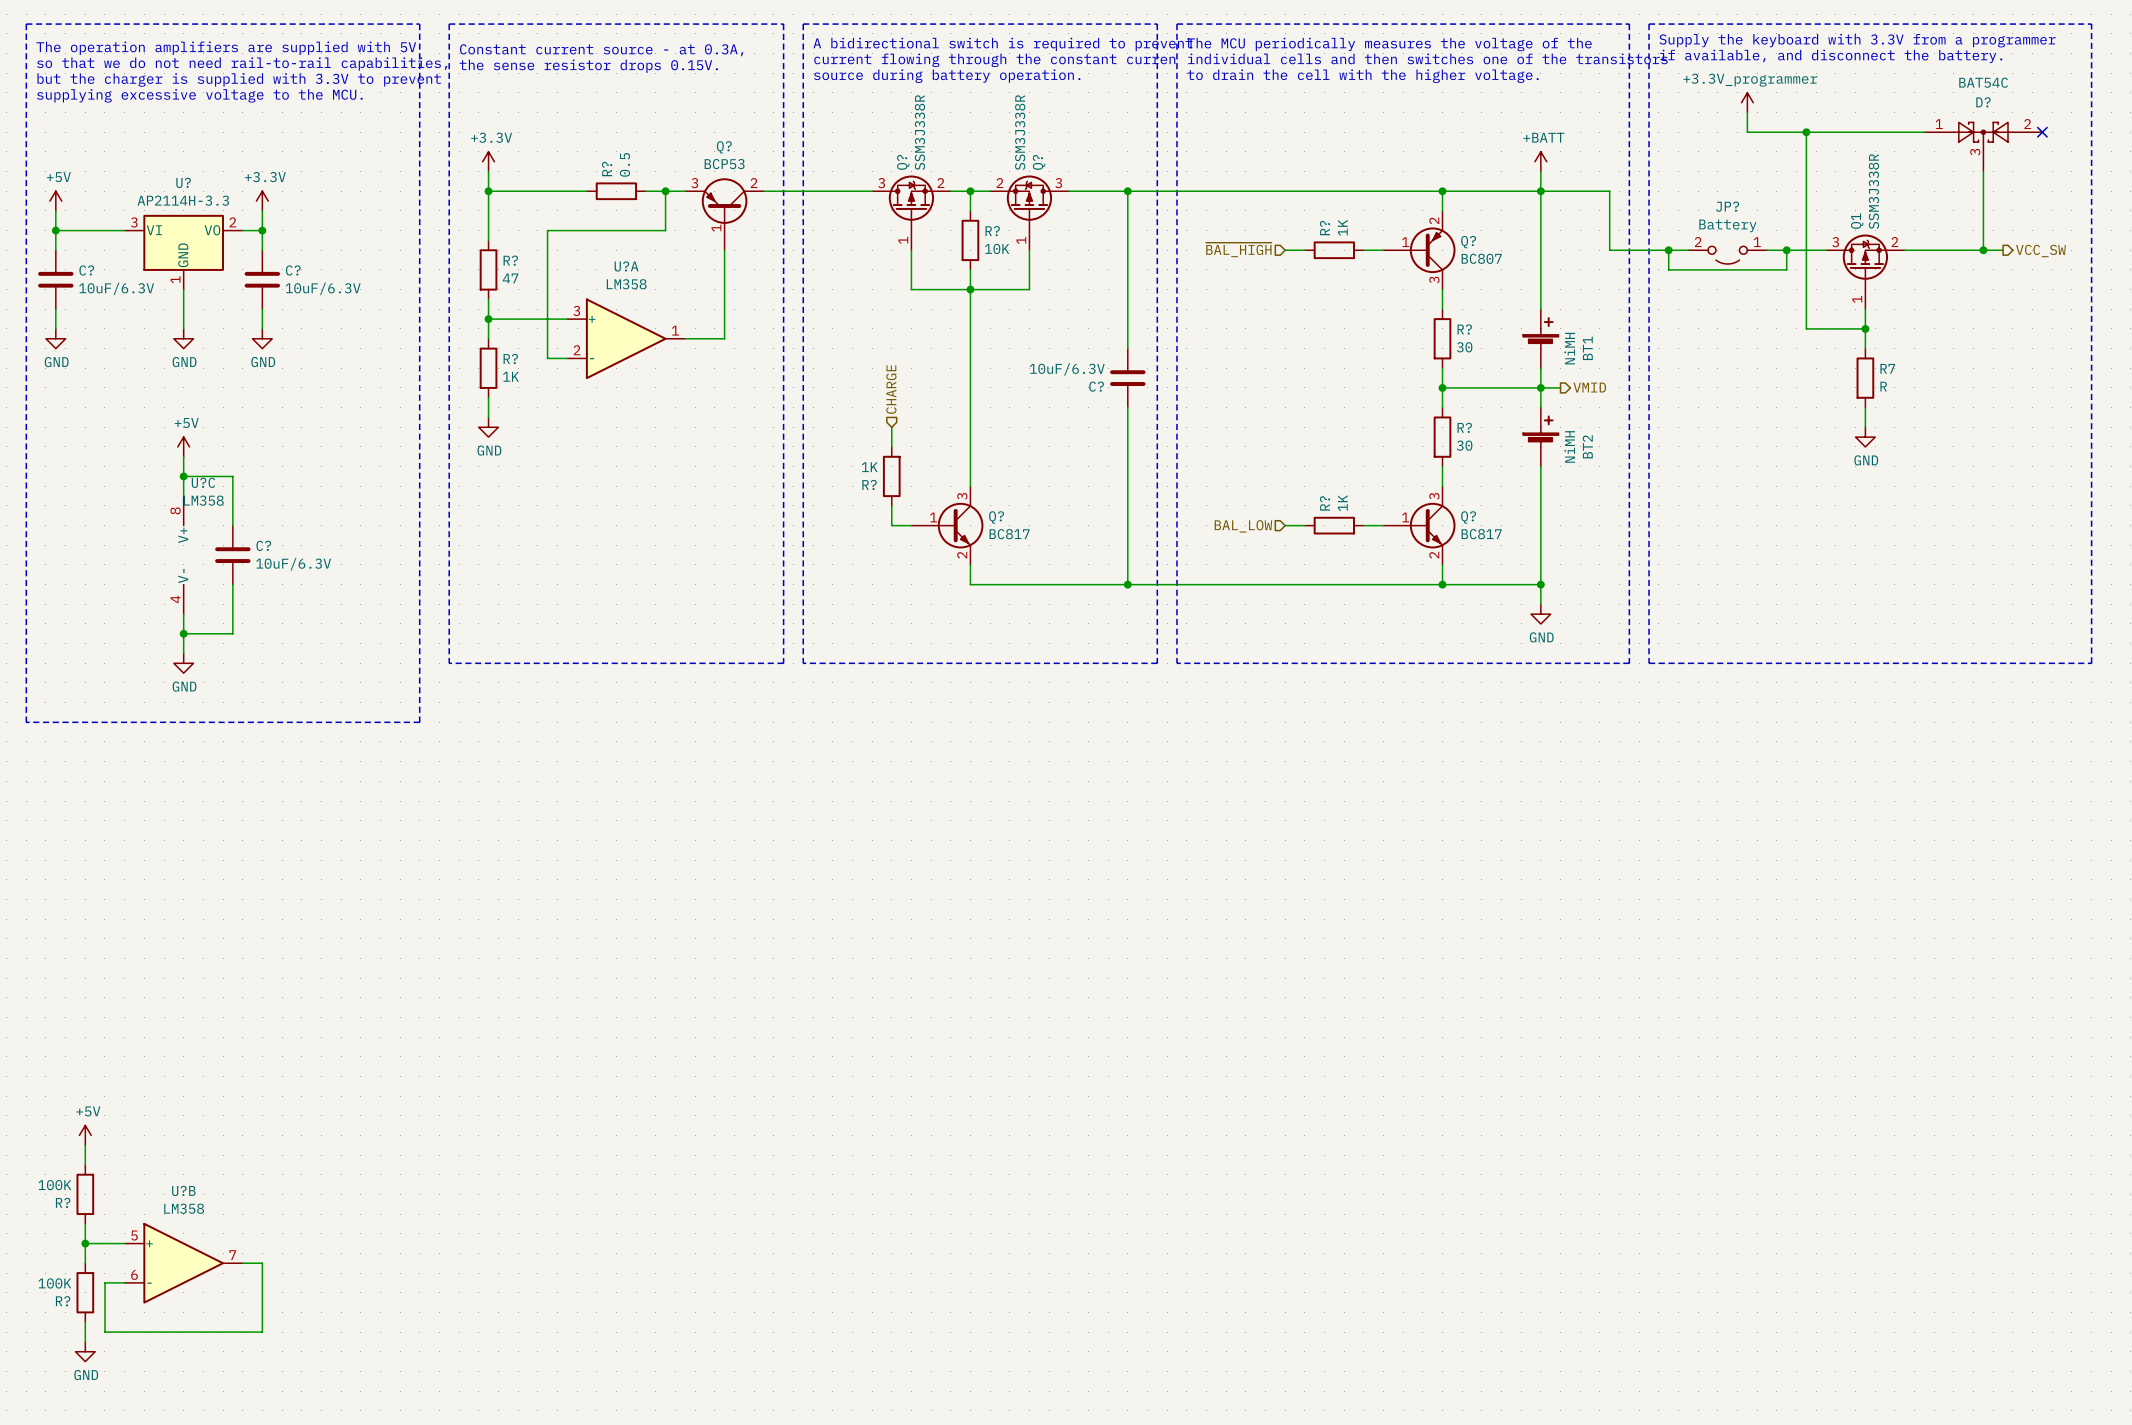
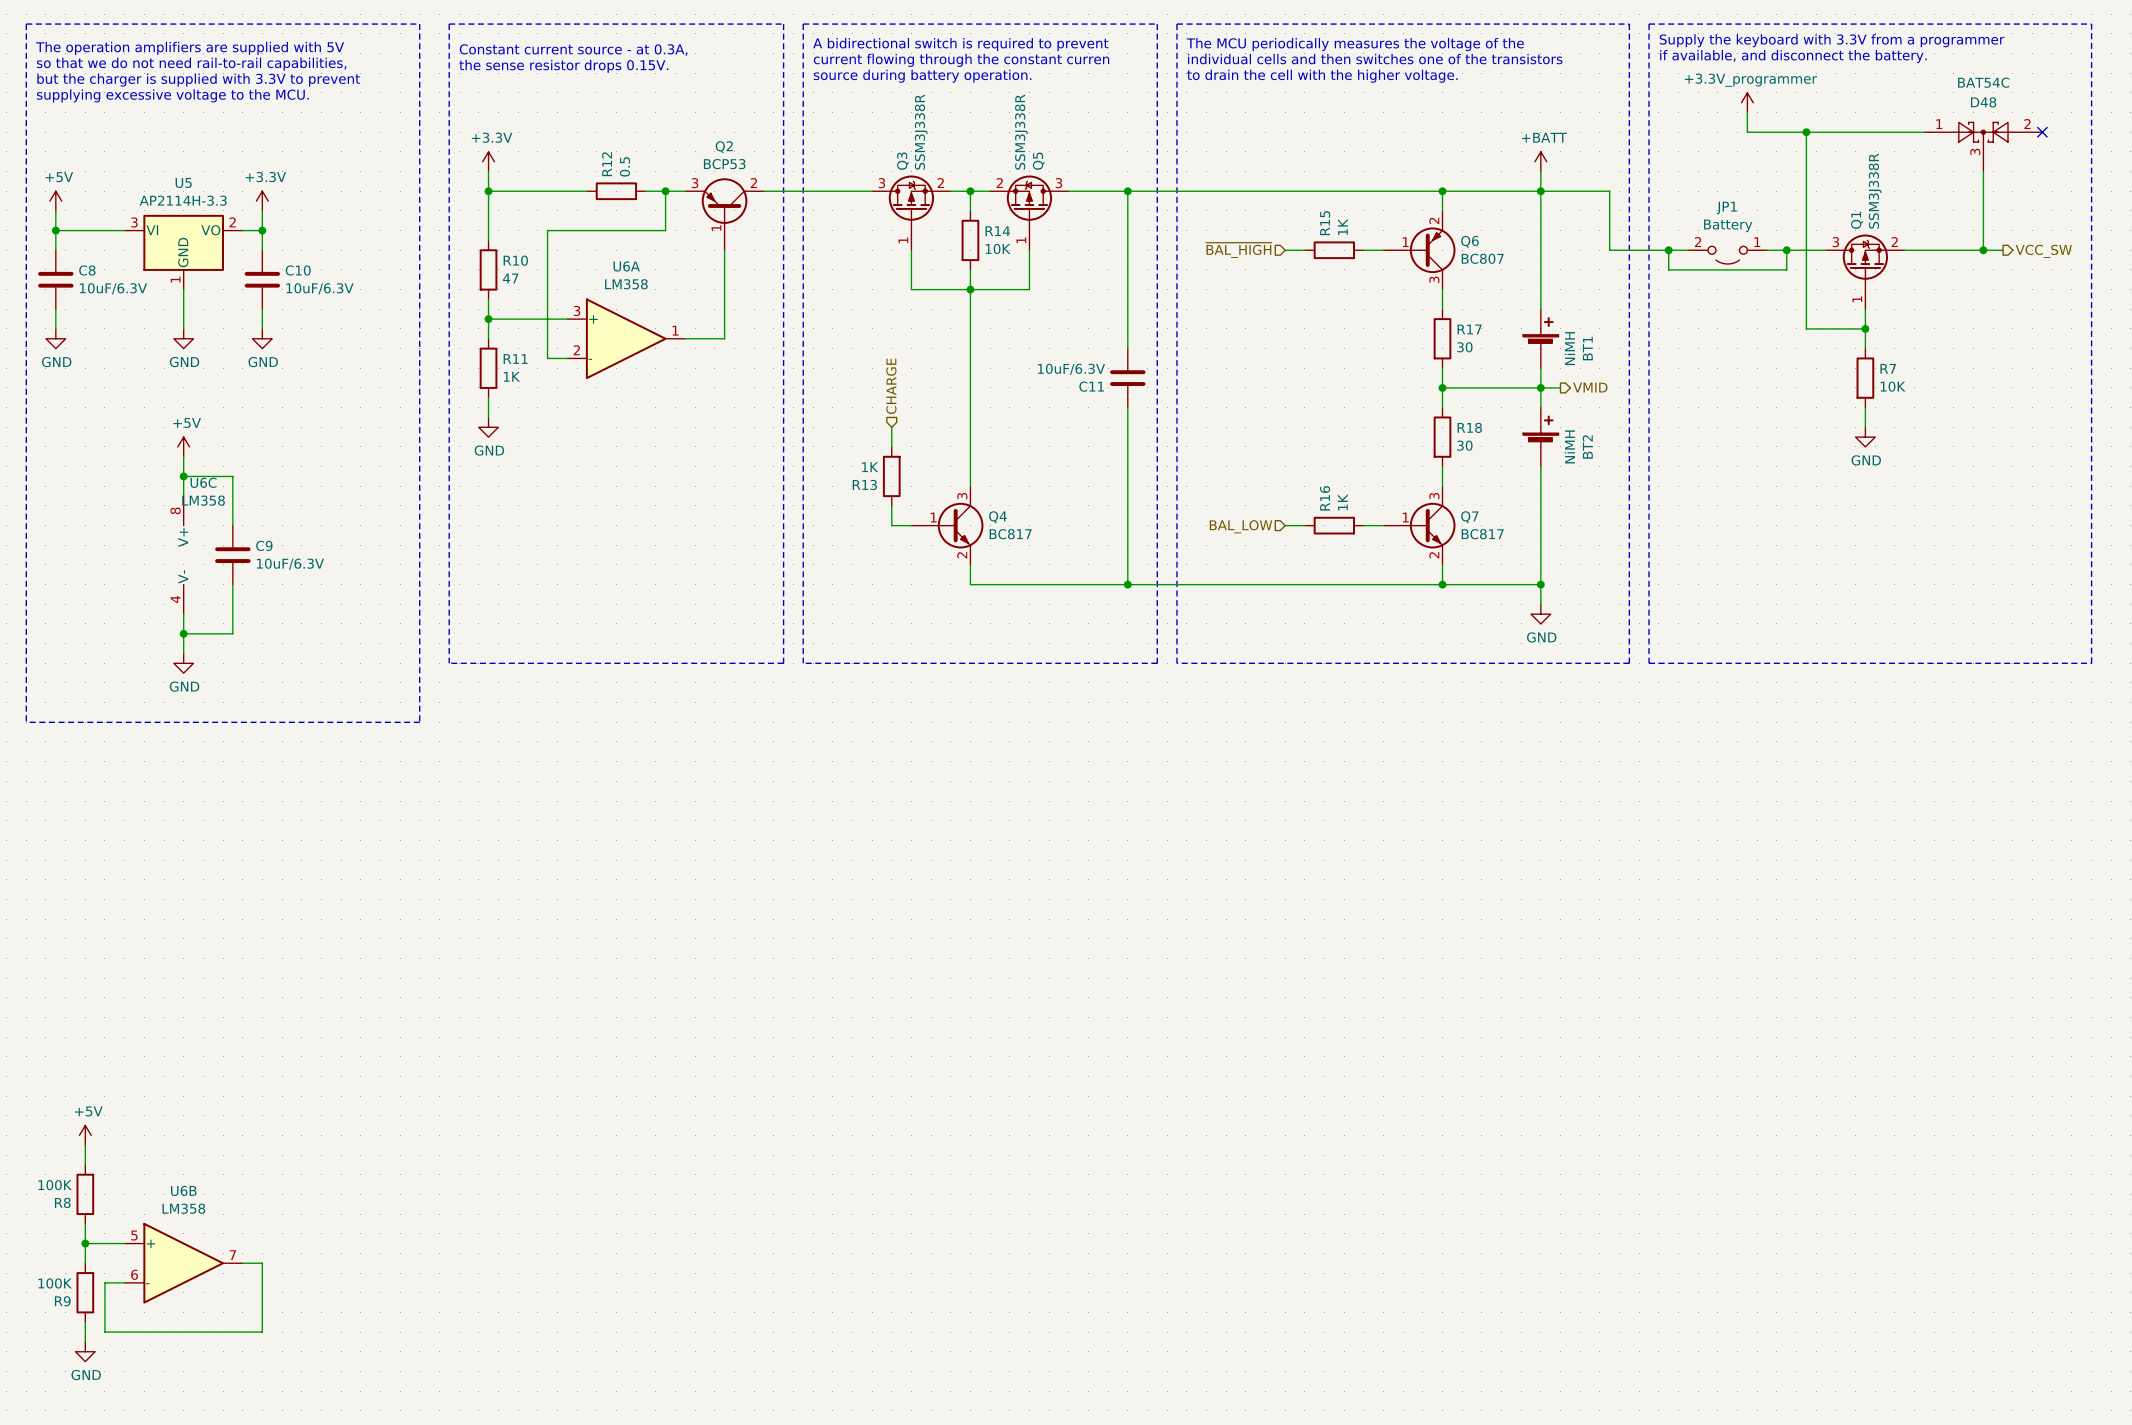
D? name: D? (1983, 102) -> D48 (1983, 102)
Q? name: Q? (724, 147) -> Q2 (724, 147)
Q? name: Q? (903, 162) -> Q3 (902, 161)
Q? name: Q? (1039, 162) -> Q5 (1038, 161)
R? name: R? (607, 169) -> R12 (607, 164)
U? name: U? (183, 182) -> U5 (183, 182)
JP? name: JP? (1727, 206) -> JP1 (1726, 208)
R? name: R? (1325, 228) -> R15 (1325, 223)
R? name: R? (992, 231) -> R14 (997, 231)
Q? name: Q? (1468, 242) -> Q6 (1469, 241)
R? name: R? (510, 260) -> R10 (515, 260)
U?A name: U?A (626, 266) -> U6A (626, 266)
C? name: C? (86, 270) -> C8 (87, 270)
C? name: C? (293, 270) -> C10 (298, 270)
R? name: R? (1464, 329) -> R17 (1469, 329)
R? name: R? (510, 358) -> R11 (515, 359)
C? name: C? (1096, 386) -> C11 (1091, 386)
R7 value: R (1883, 386) -> 10K (1893, 386)
R? name: R? (1464, 427) -> R18 (1469, 427)
U?C name: U?C (203, 482) -> U6C (203, 482)
R? name: R? (869, 484) -> R13 (864, 485)
R? name: R? (1325, 503) -> R16 (1325, 498)
Q? name: Q? (996, 517) -> Q4 (997, 517)
Q? name: Q? (1468, 517) -> Q7 (1469, 517)
C? name: C? (263, 545) -> C9 (264, 545)
U?B name: U?B (183, 1190) -> U6B (183, 1190)
R? name: R? (63, 1202) -> R8 (62, 1202)
R? name: R? (63, 1301) -> R9 (62, 1301)

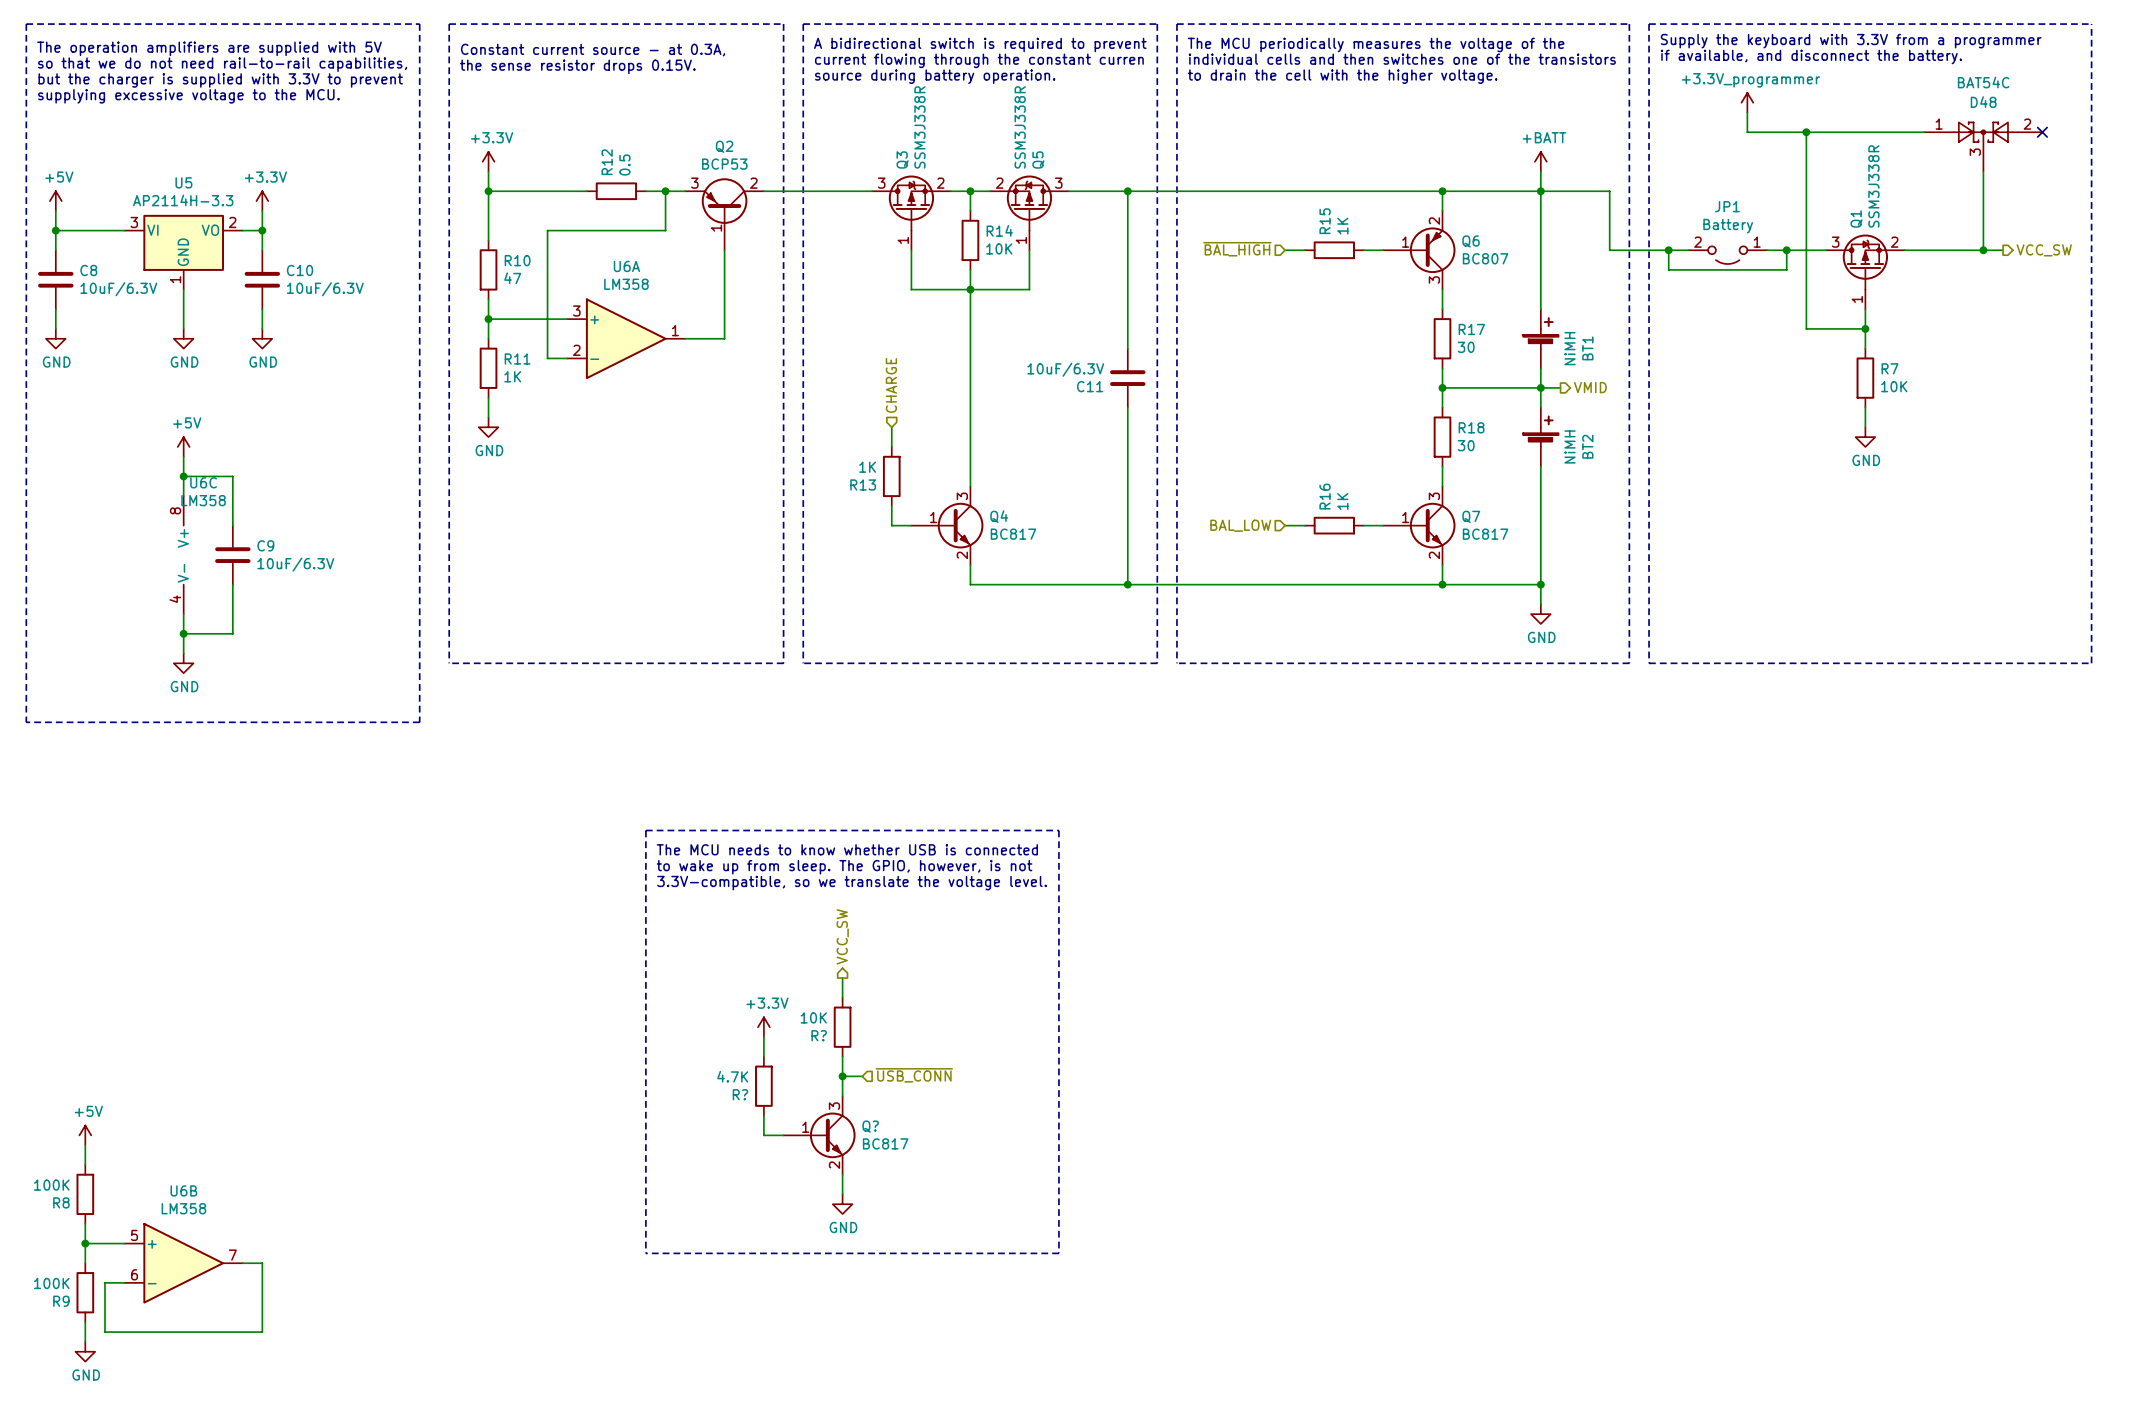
line: none -> (645, 830) (645, 1253) (1058, 1253) (1058, 830) (645, 830)
text: none -> The MCU needs to know whether USB is connected (847, 849)
text: none -> to wake up from sleep. The GPIO, however, is not (844, 867)
text: none -> 3.3V-compatible, so we translate the voltage level. (852, 883)
hierarchical label: none -> VCC_SW (842, 936)
wire: none -> (842, 978) (842, 997)
power symbol: none -> +3.3V (763, 1027)
R?: none -> 10K (842, 1027)
wire: none -> (763, 1037) (763, 1056)
wire: none -> (842, 1056) (842, 1096)
wire: none -> (842, 1076) (862, 1076)
junction: none -> (842, 1076)
hierarchical label: none -> ~{USB_CONN} (914, 1075)
R?: none -> 4.7K (763, 1086)
wire: none -> (763, 1115) (763, 1135) (783, 1135)
Q?: none -> BC817 (819, 1135)
wire: none -> (842, 1174) (842, 1194)
power symbol: none -> GND (842, 1204)

